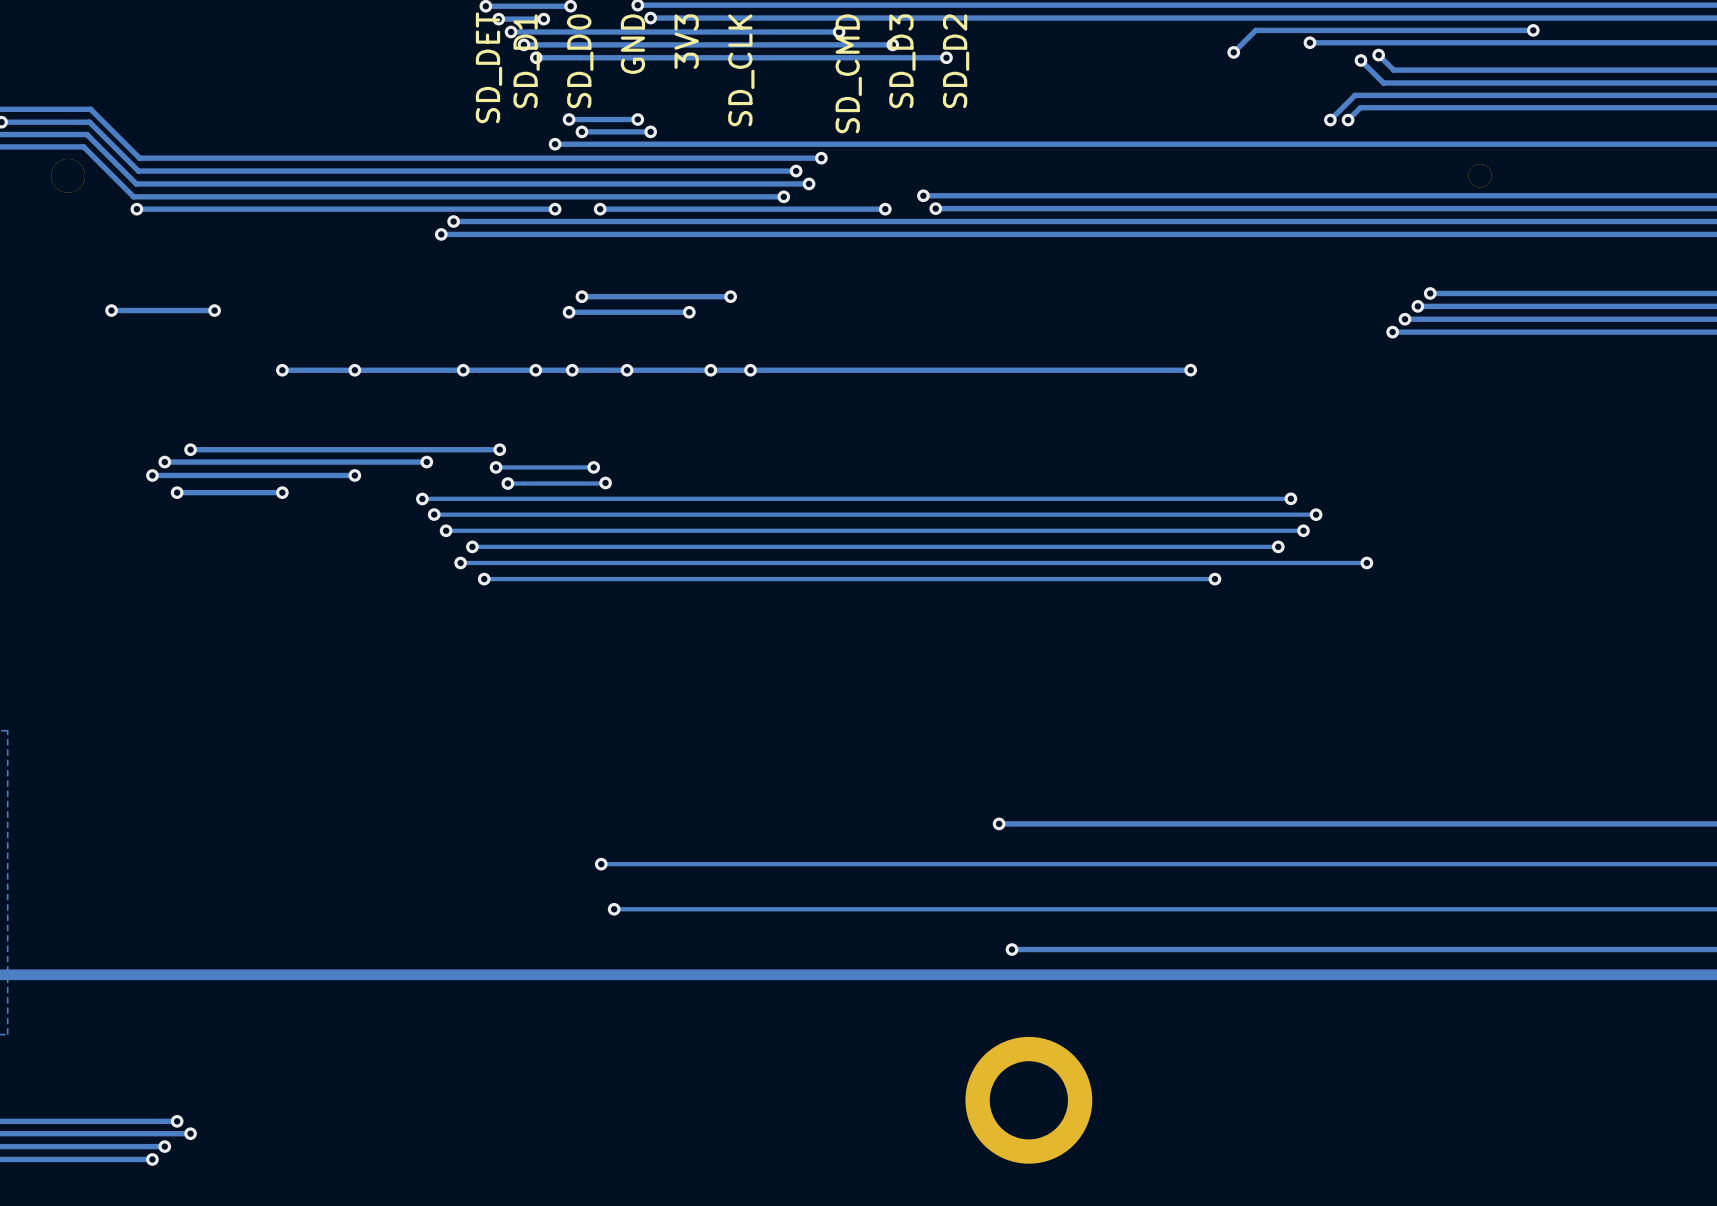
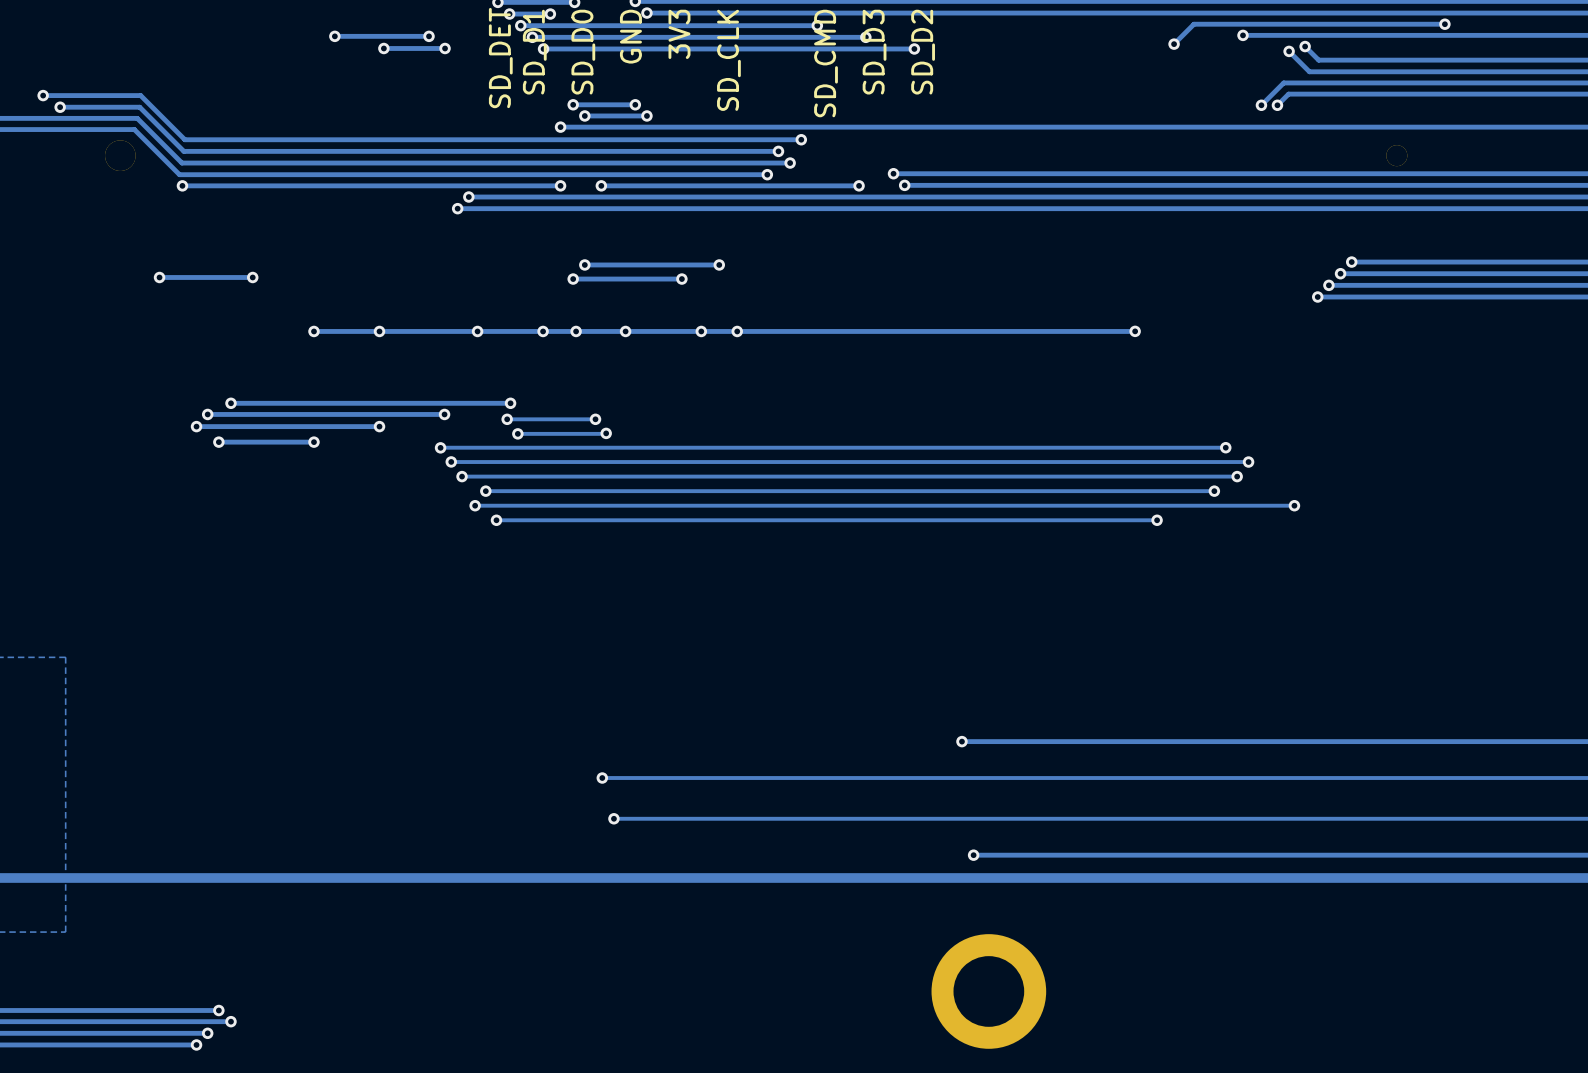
via: none -> (334, 36)
track: none -> (429, 36) (334, 36)
via: none -> (429, 36)
via: none -> (383, 48)
track: none -> (445, 48) (383, 48)
via: none -> (445, 48)

